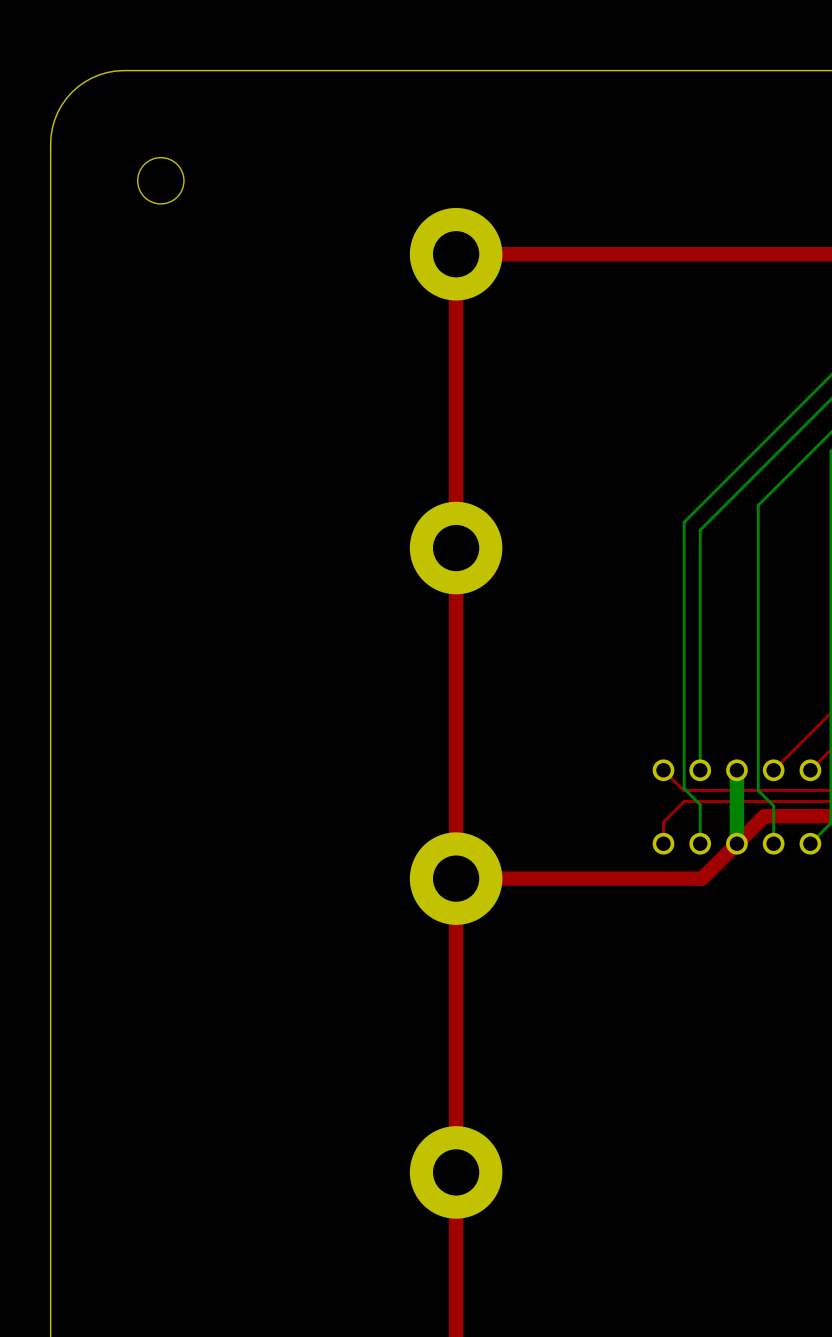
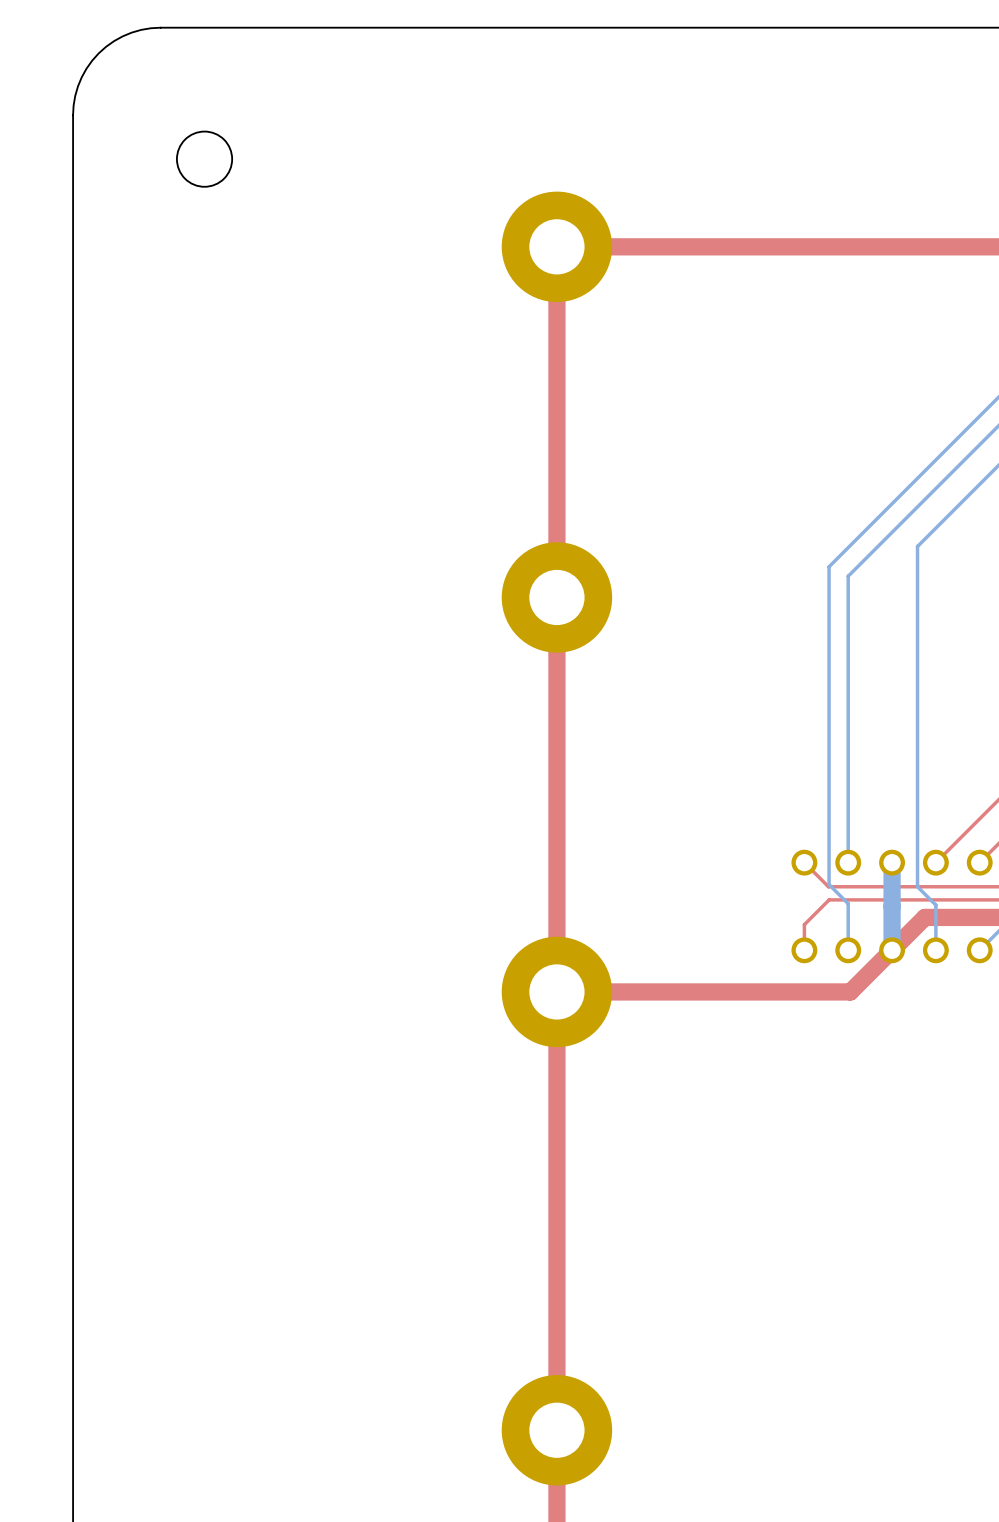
part position: (456, 1172) -> (556, 1430)

